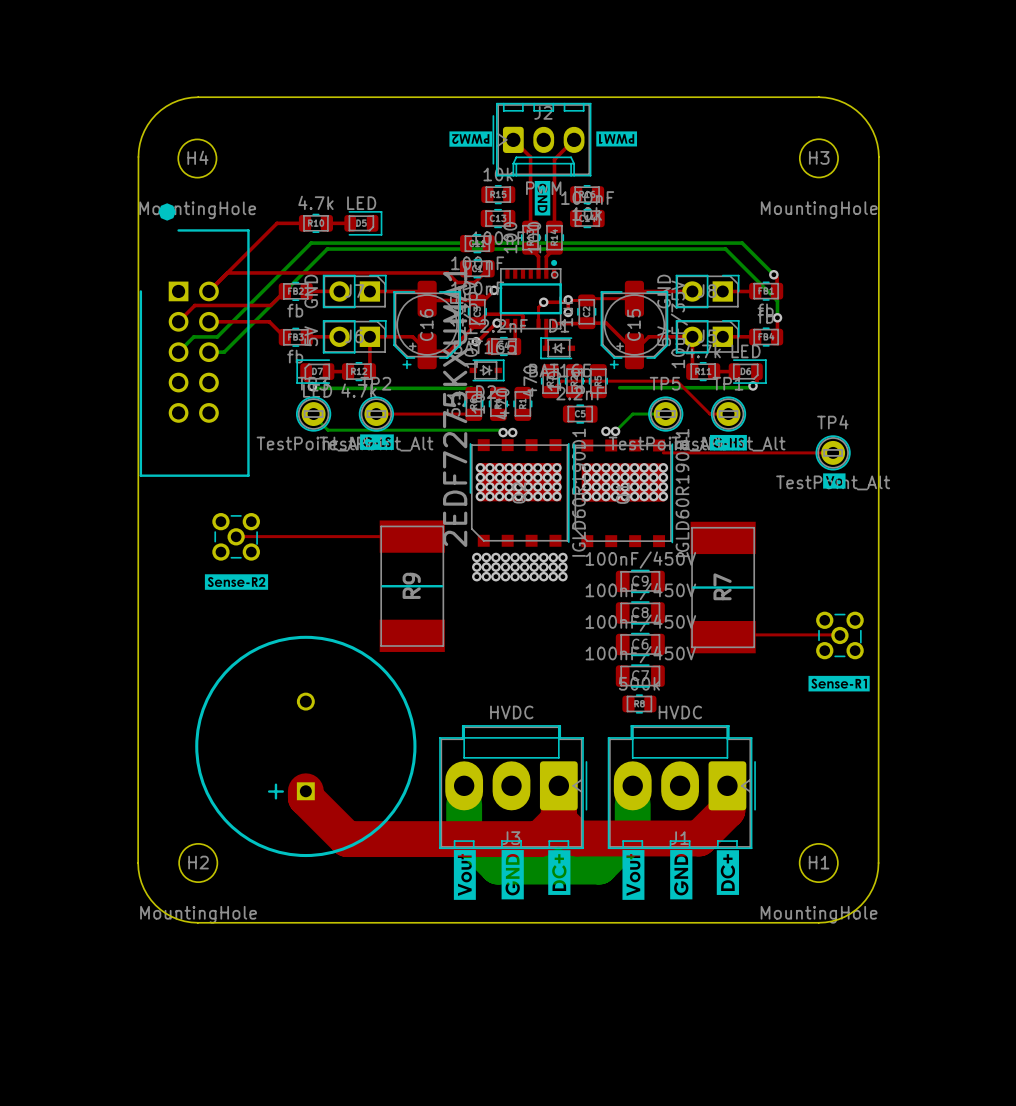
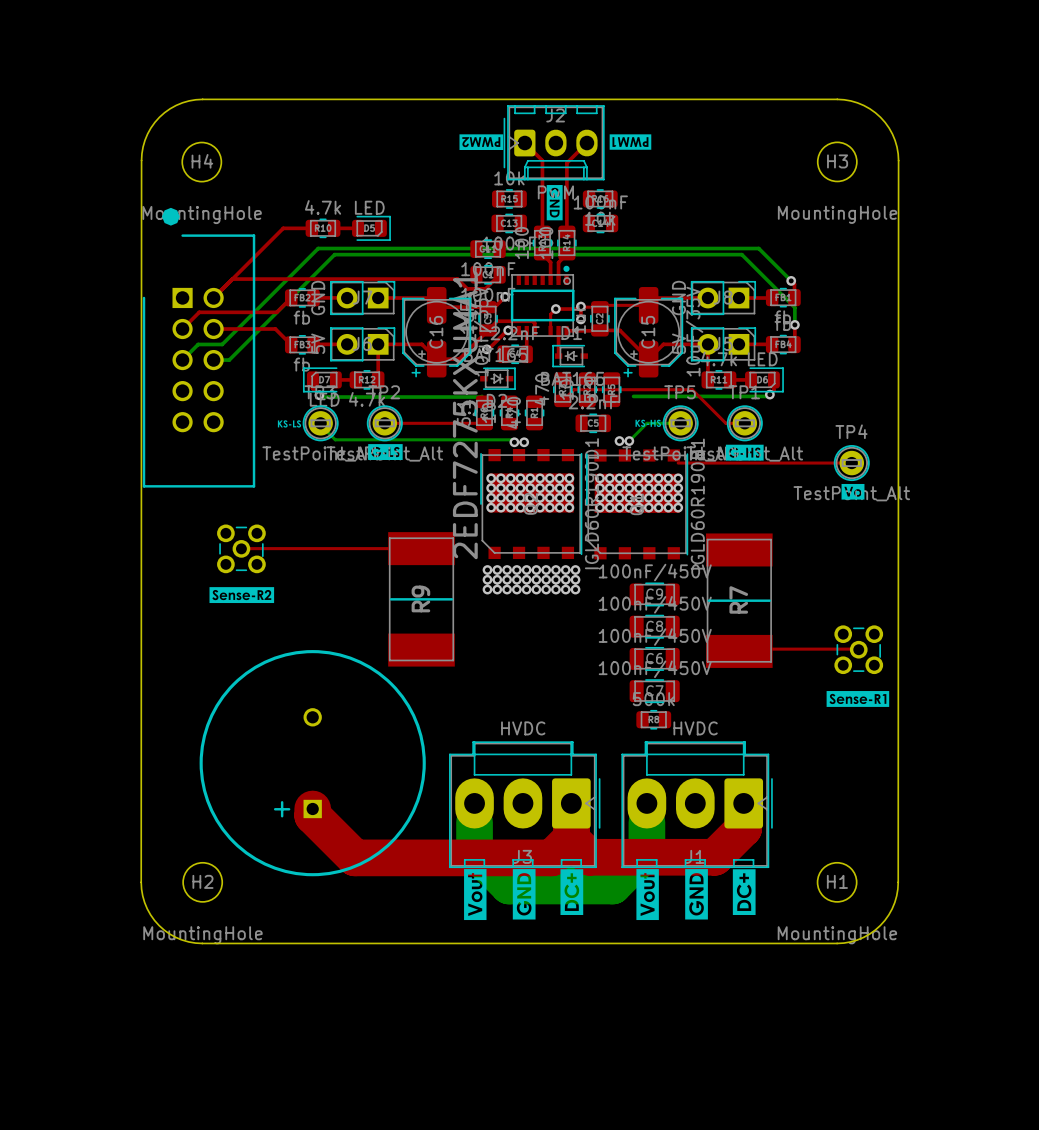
drawing: none -> [635, 419, 662, 427]
drawing: none -> [277, 420, 302, 428]

